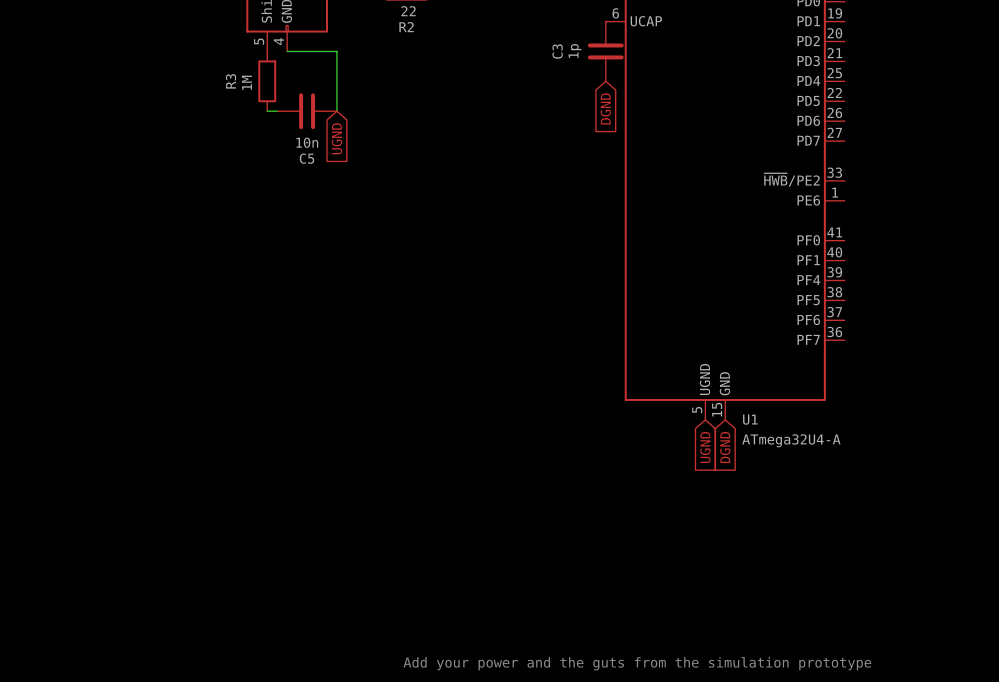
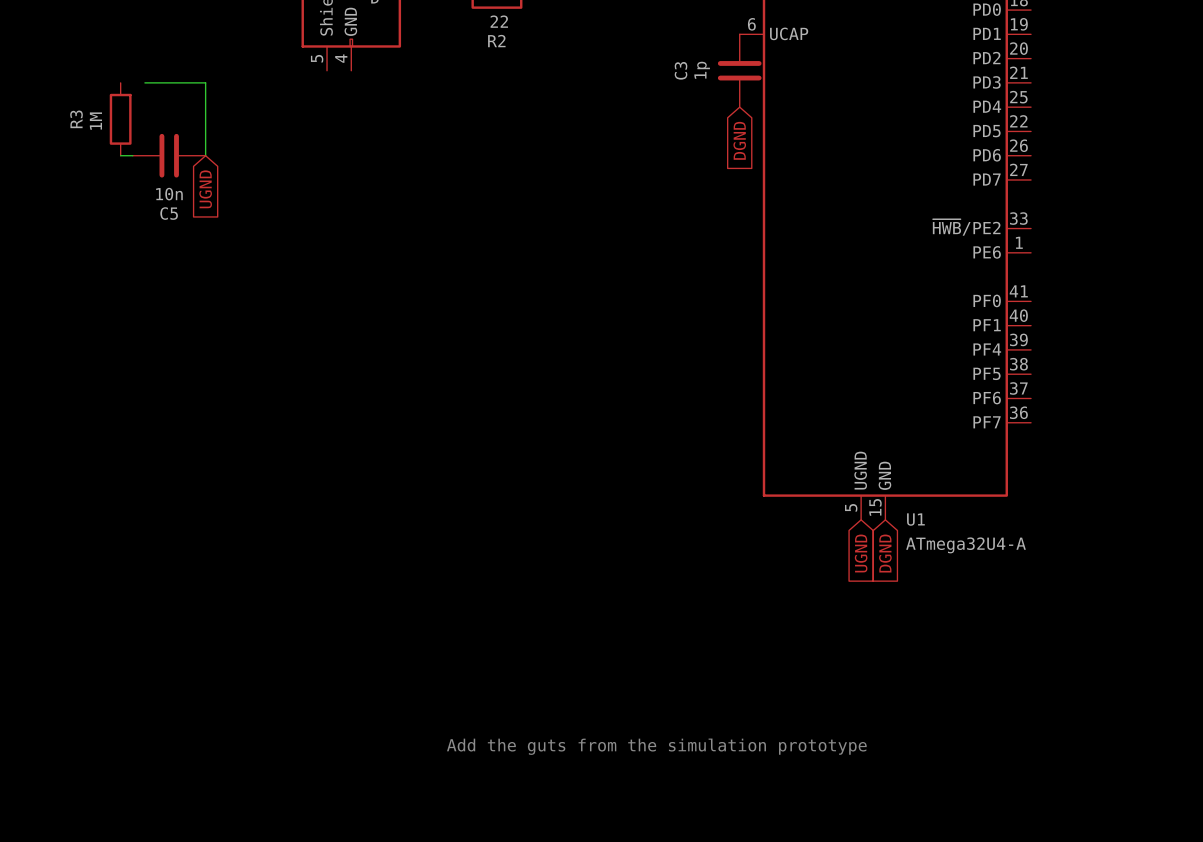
wire: (287, 51) (336, 51) (336, 111) -> (144, 82) (205, 82) (205, 155)
R3 position: (267, 81) -> (120, 119)
wire: (267, 111) (277, 111) -> (120, 155) (132, 155)
C5 position: (307, 111) -> (169, 155)
global label position: UGND (336, 138) -> UGND (205, 189)
text: none -> Add the guts from the simulation prototype (656, 746)
text: Add your power and the guts from the simulation prototype (637, 663) -> none

